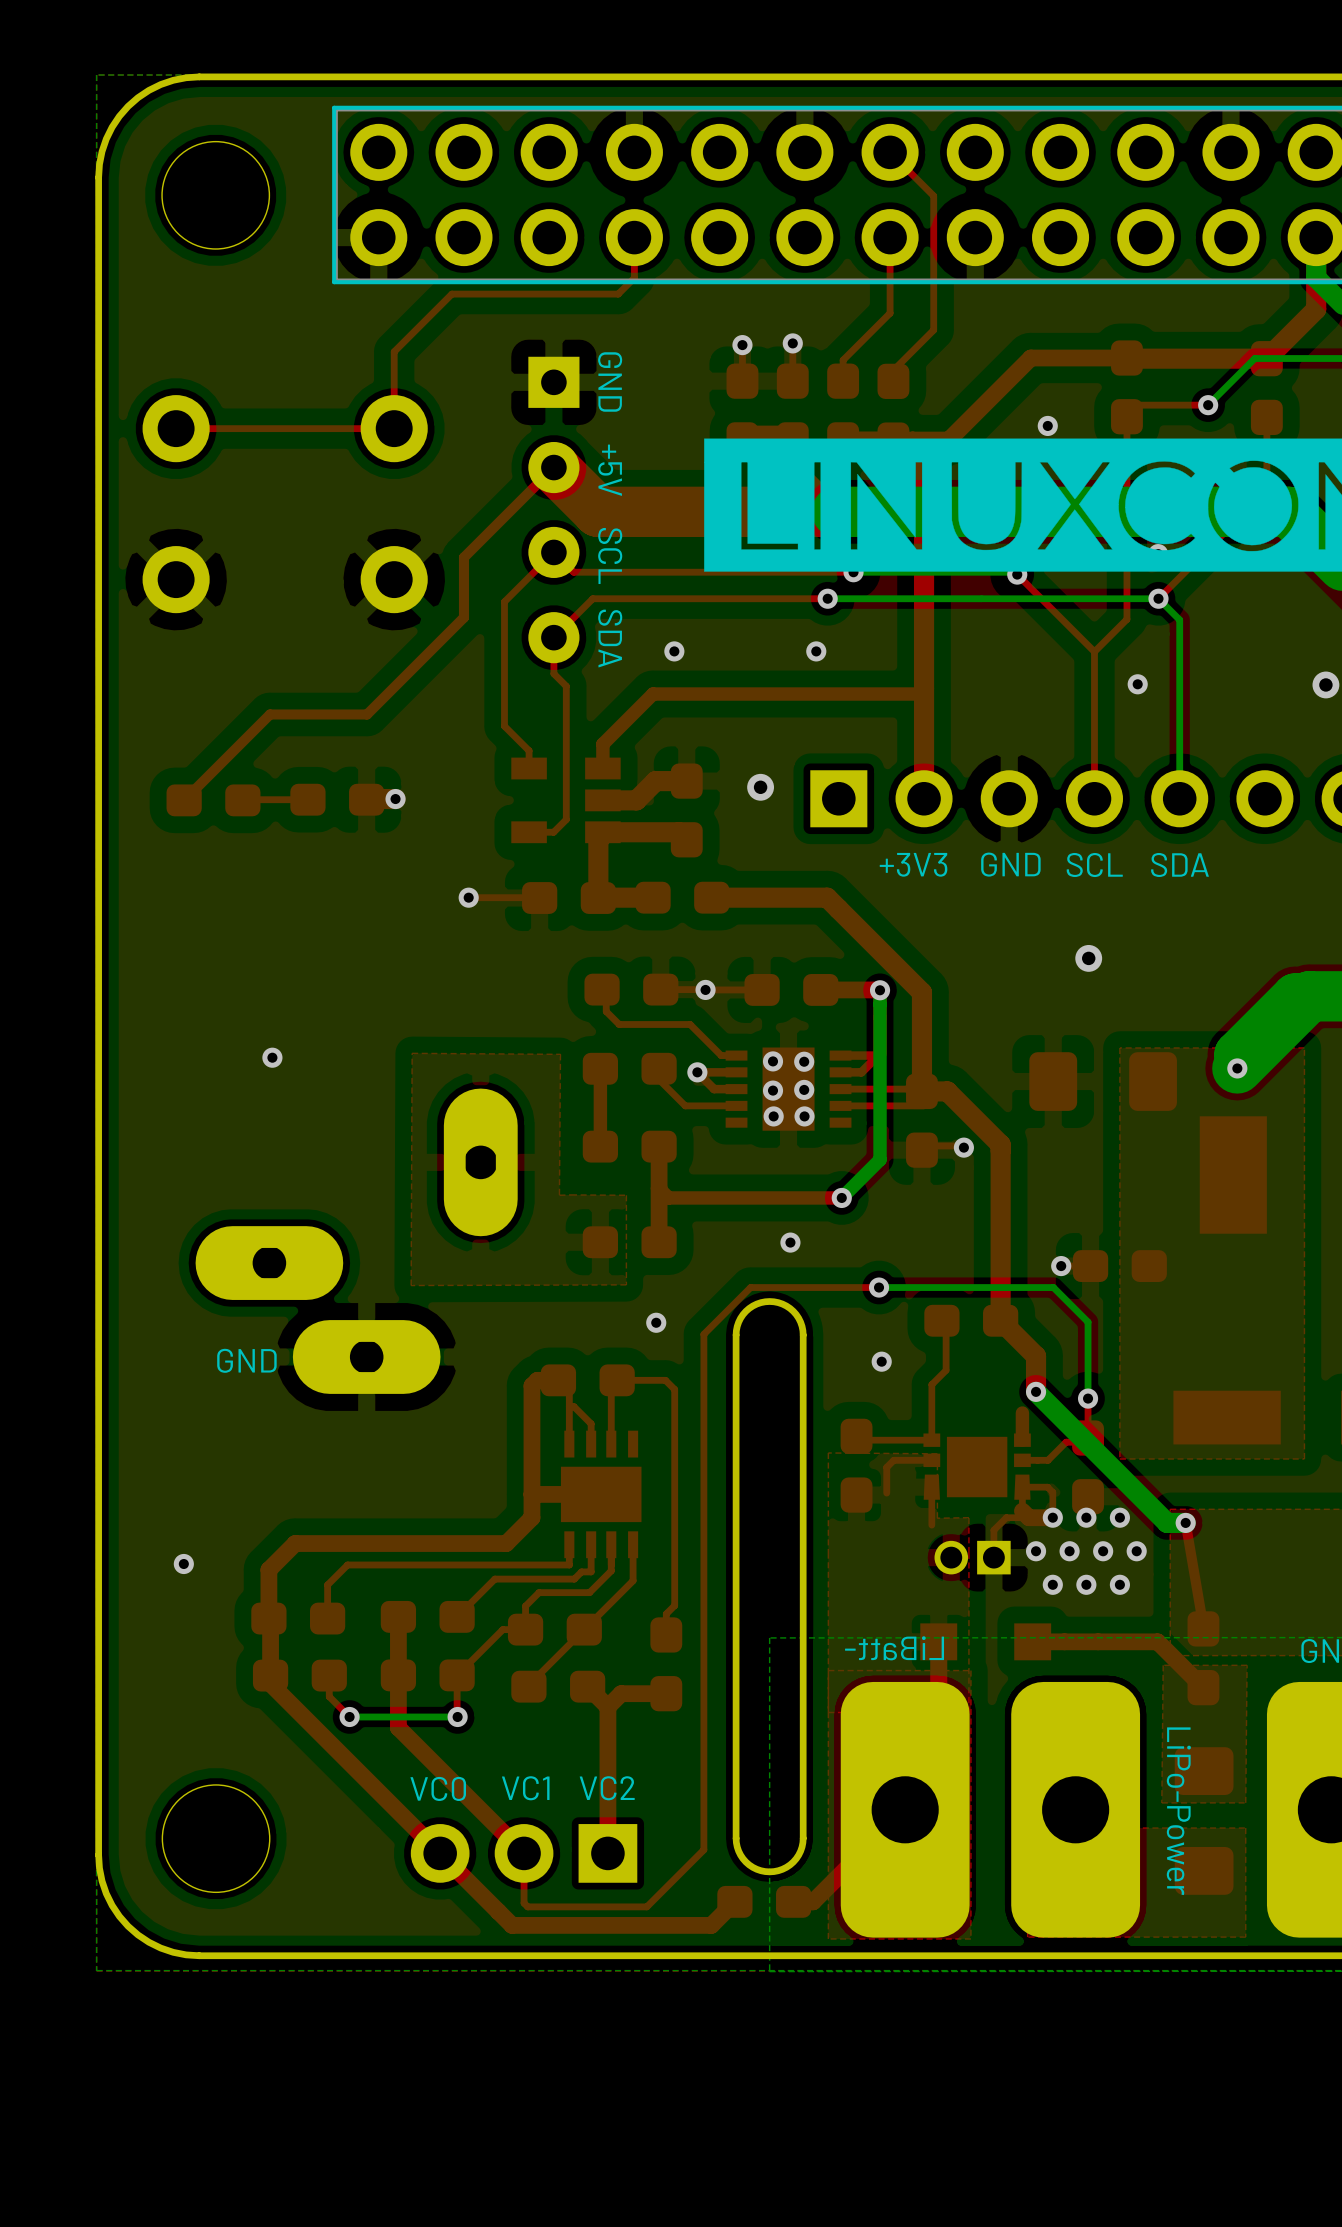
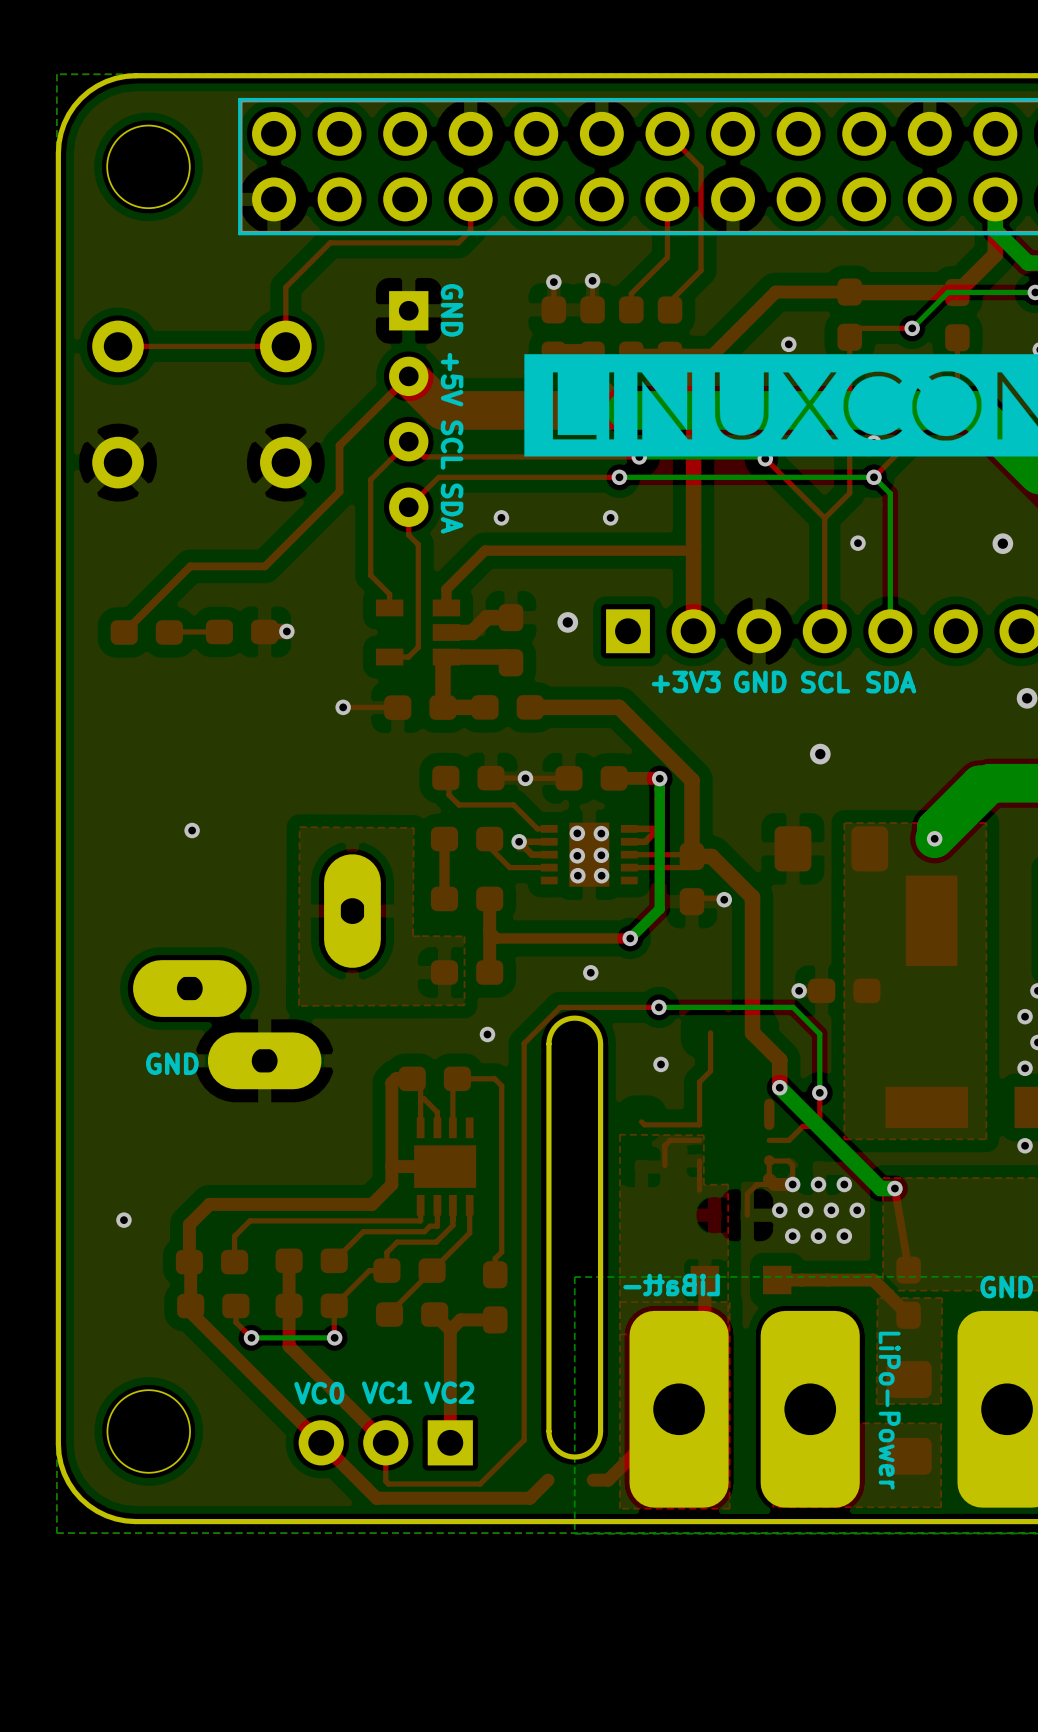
part: (971, 1320) -> none
part: (856, 1465) -> none
part: (977, 1466) -> none
part: (1088, 1467) -> none
part: (972, 1557) -> none
part: (764, 1901) -> none

